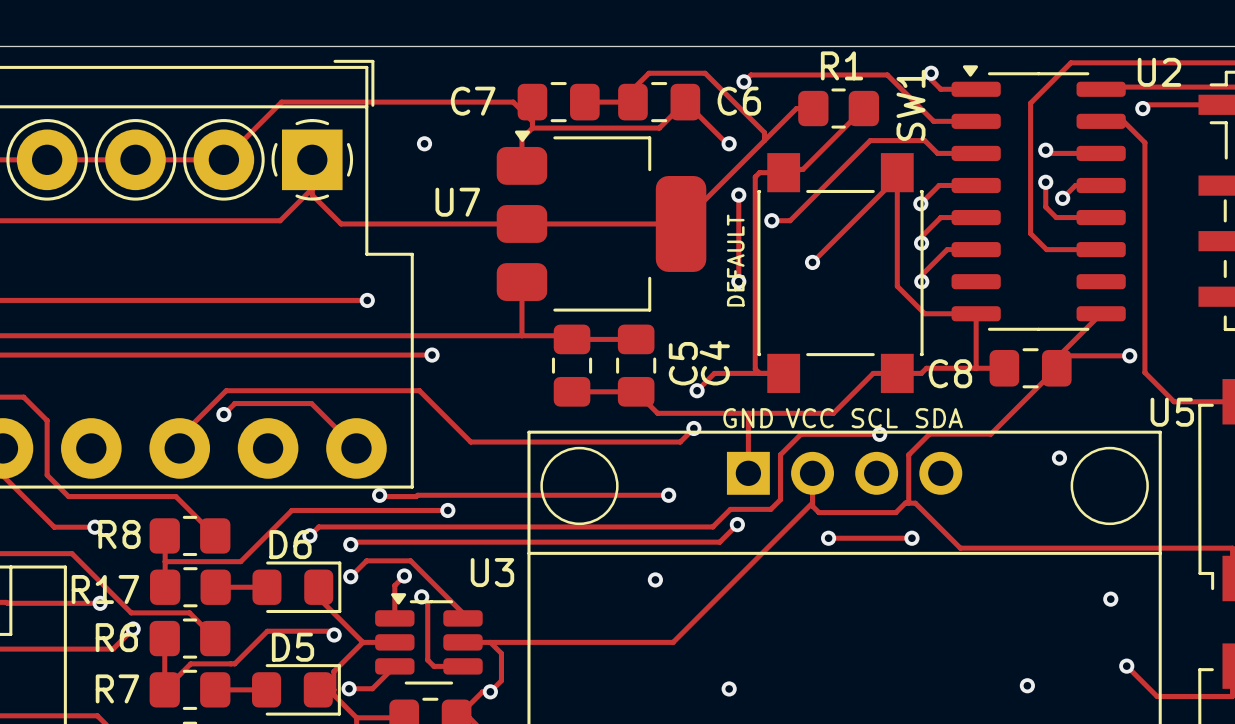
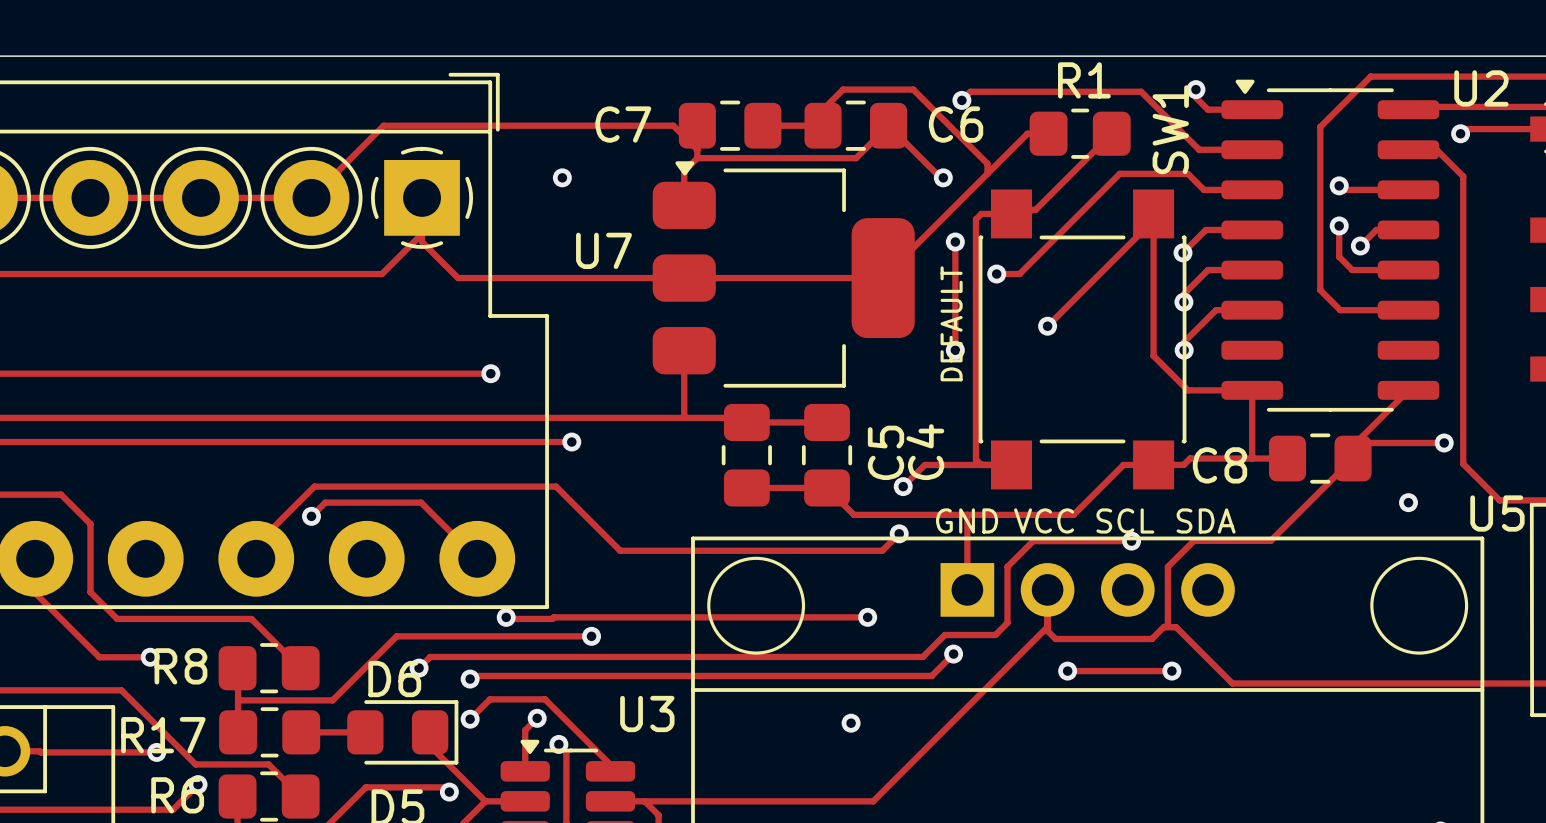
via position: (1059, 458) -> (1408, 502)
via: (1110, 599) -> none

